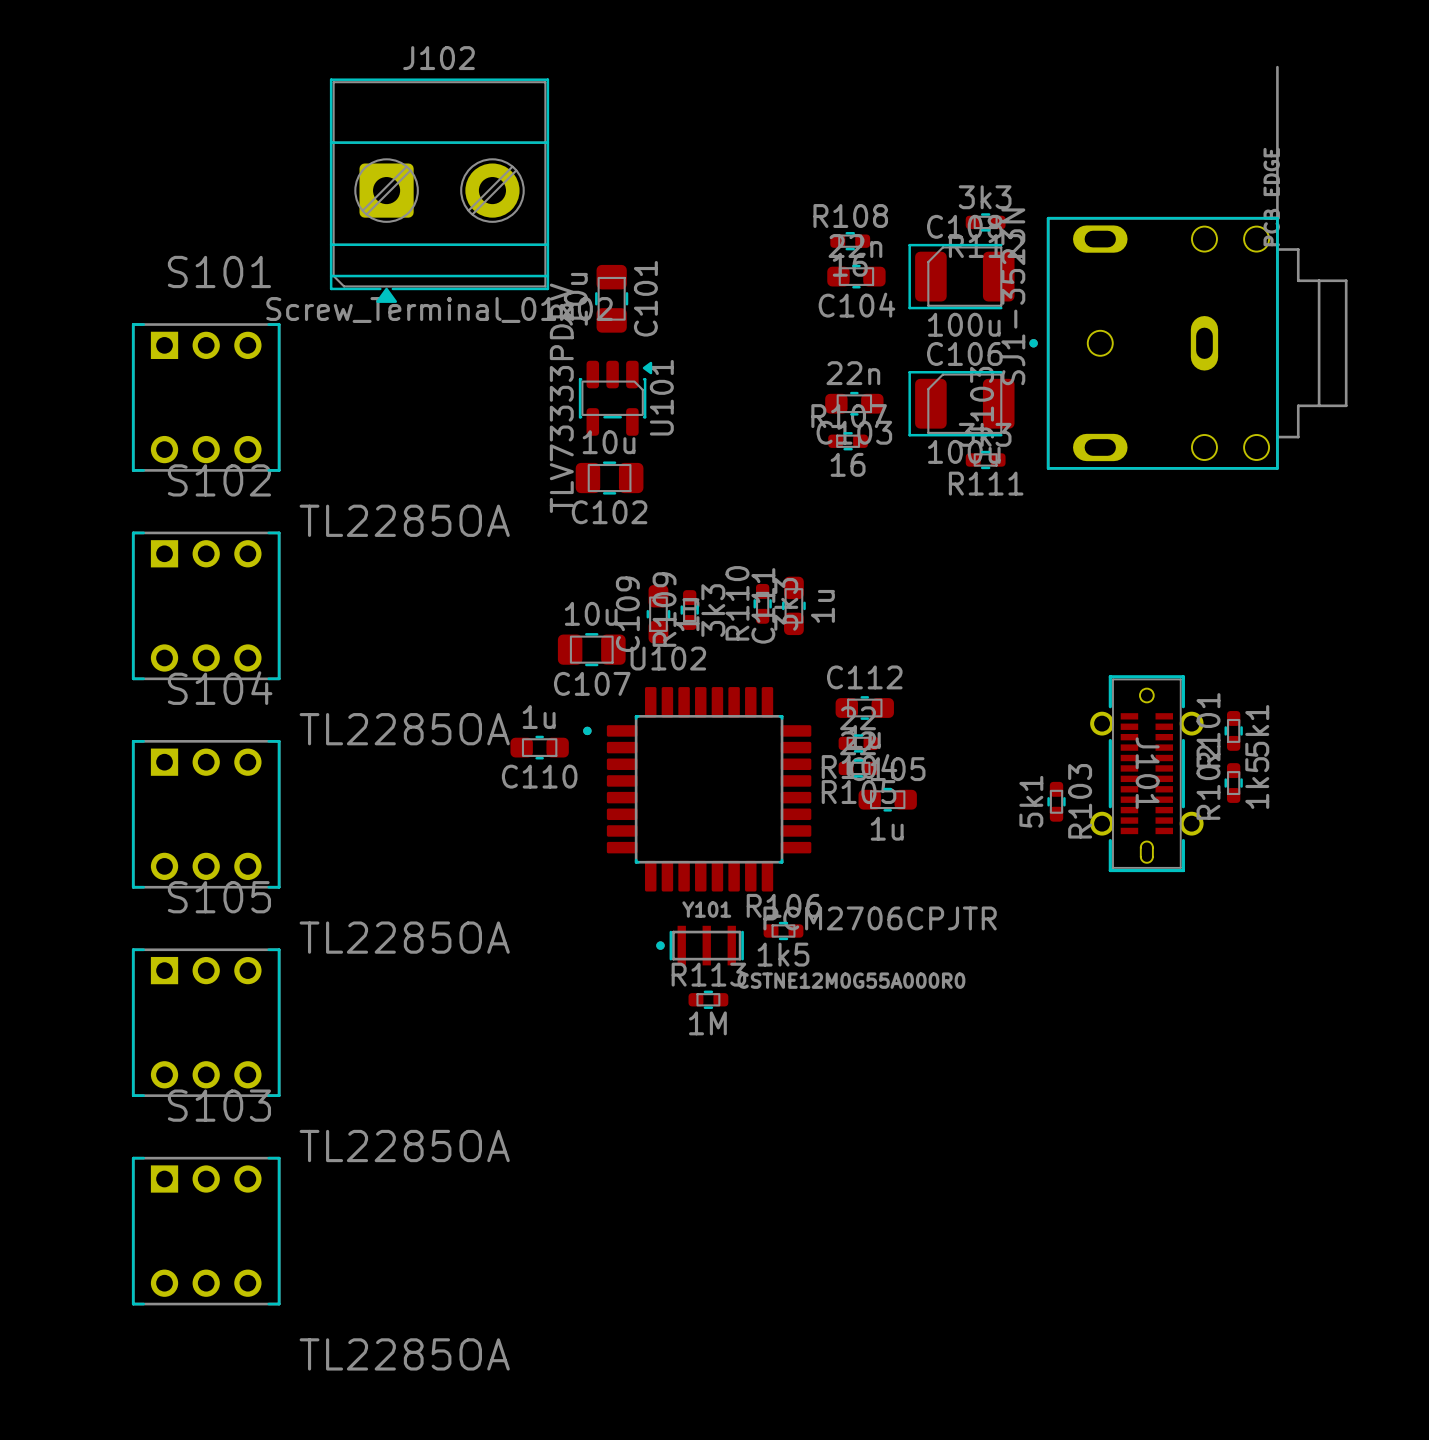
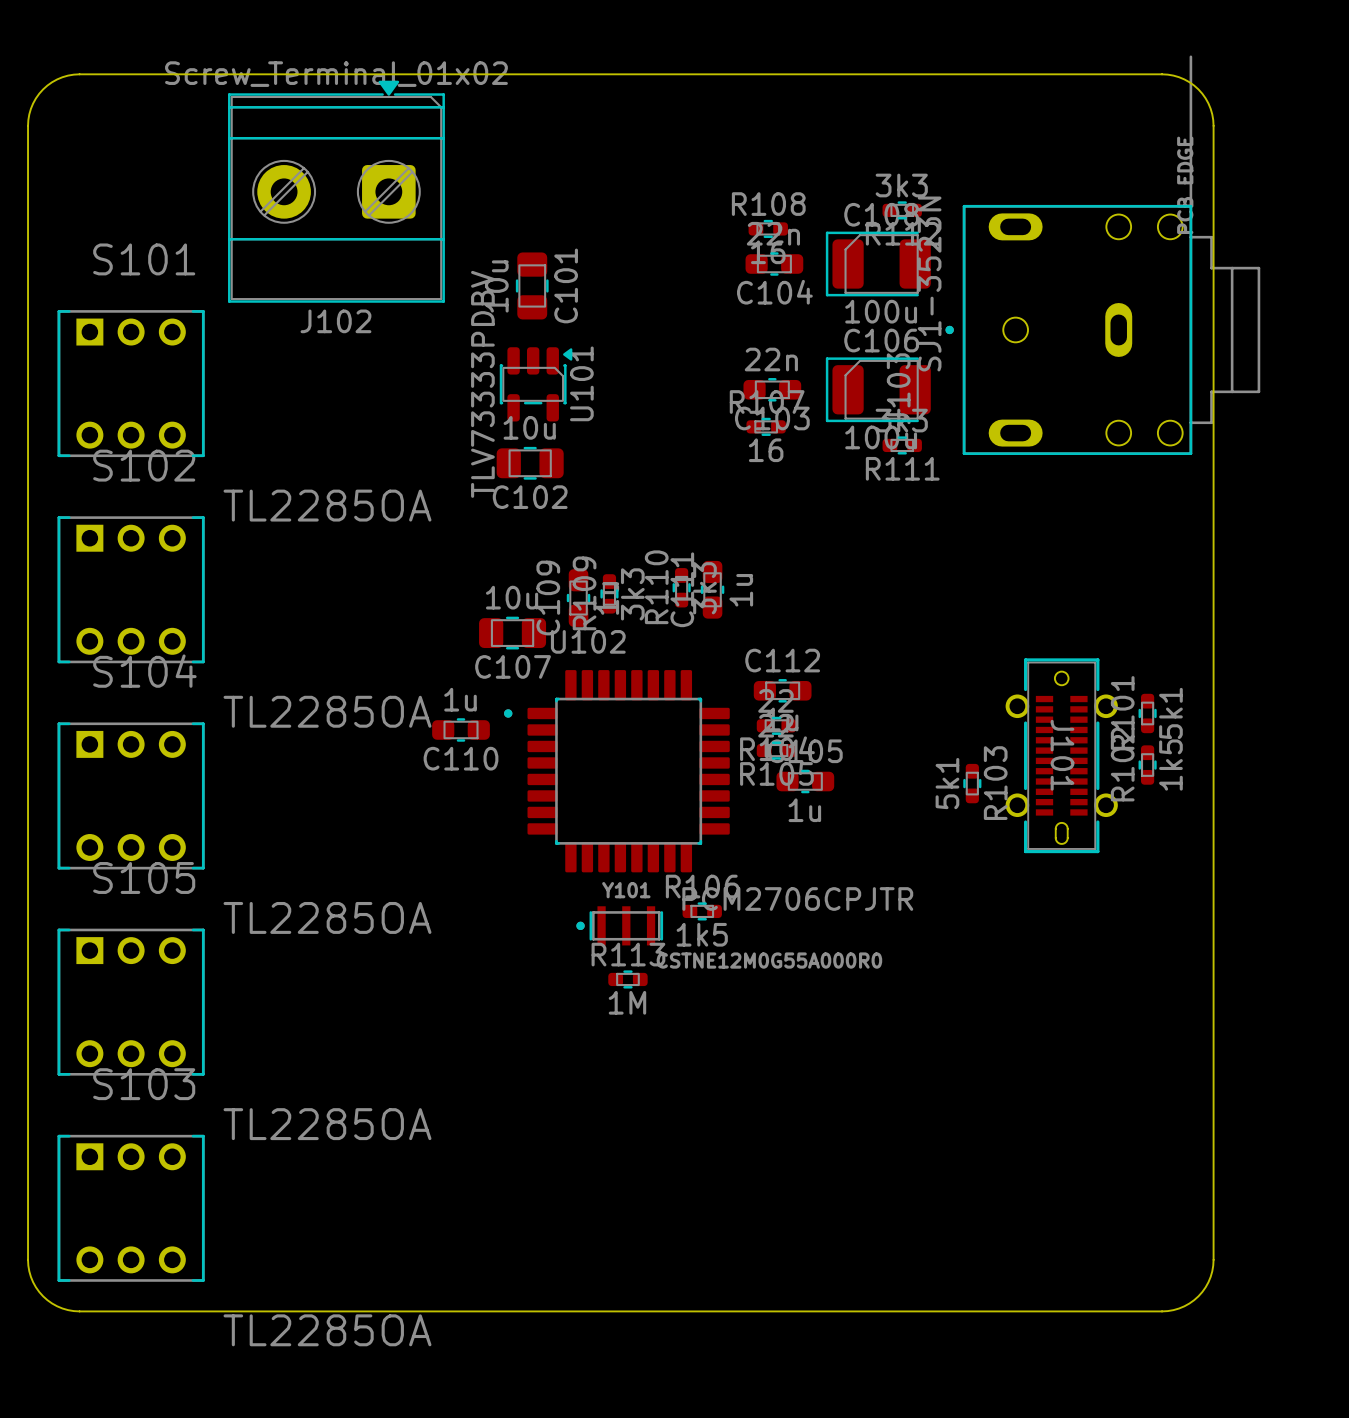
board edge: none -> (79, 74) (1162, 74) (1184, 79) (1198, 89) (1210, 108) (1213, 125) (1213, 1259) (1208, 1282) (1198, 1296) (1184, 1306) (1162, 1311) (79, 1311) (62, 1308) (43, 1296) (30, 1276) (28, 1259) (28, 125) (30, 108) (43, 89) (62, 77) (79, 74)
J102 rotation: 0° (439, 190) -> 180° (336, 191)

